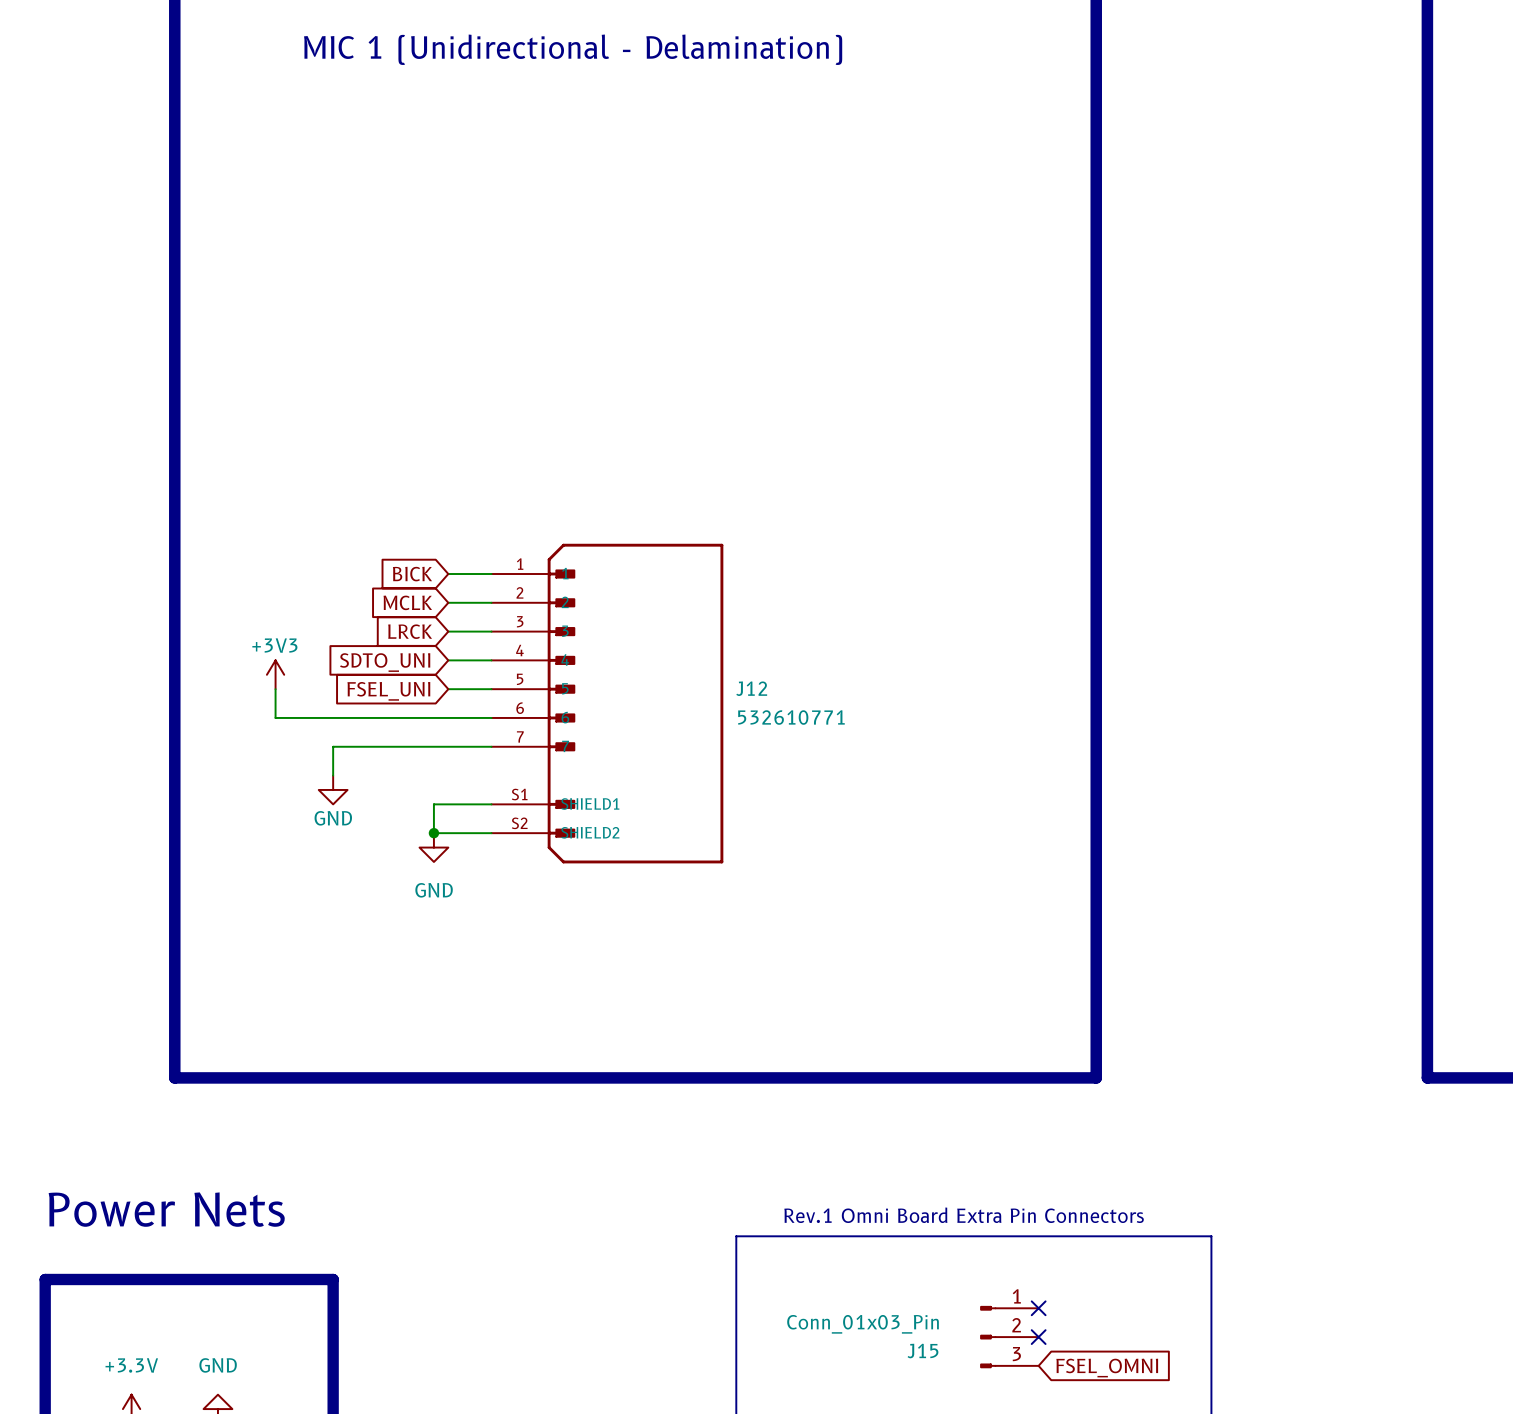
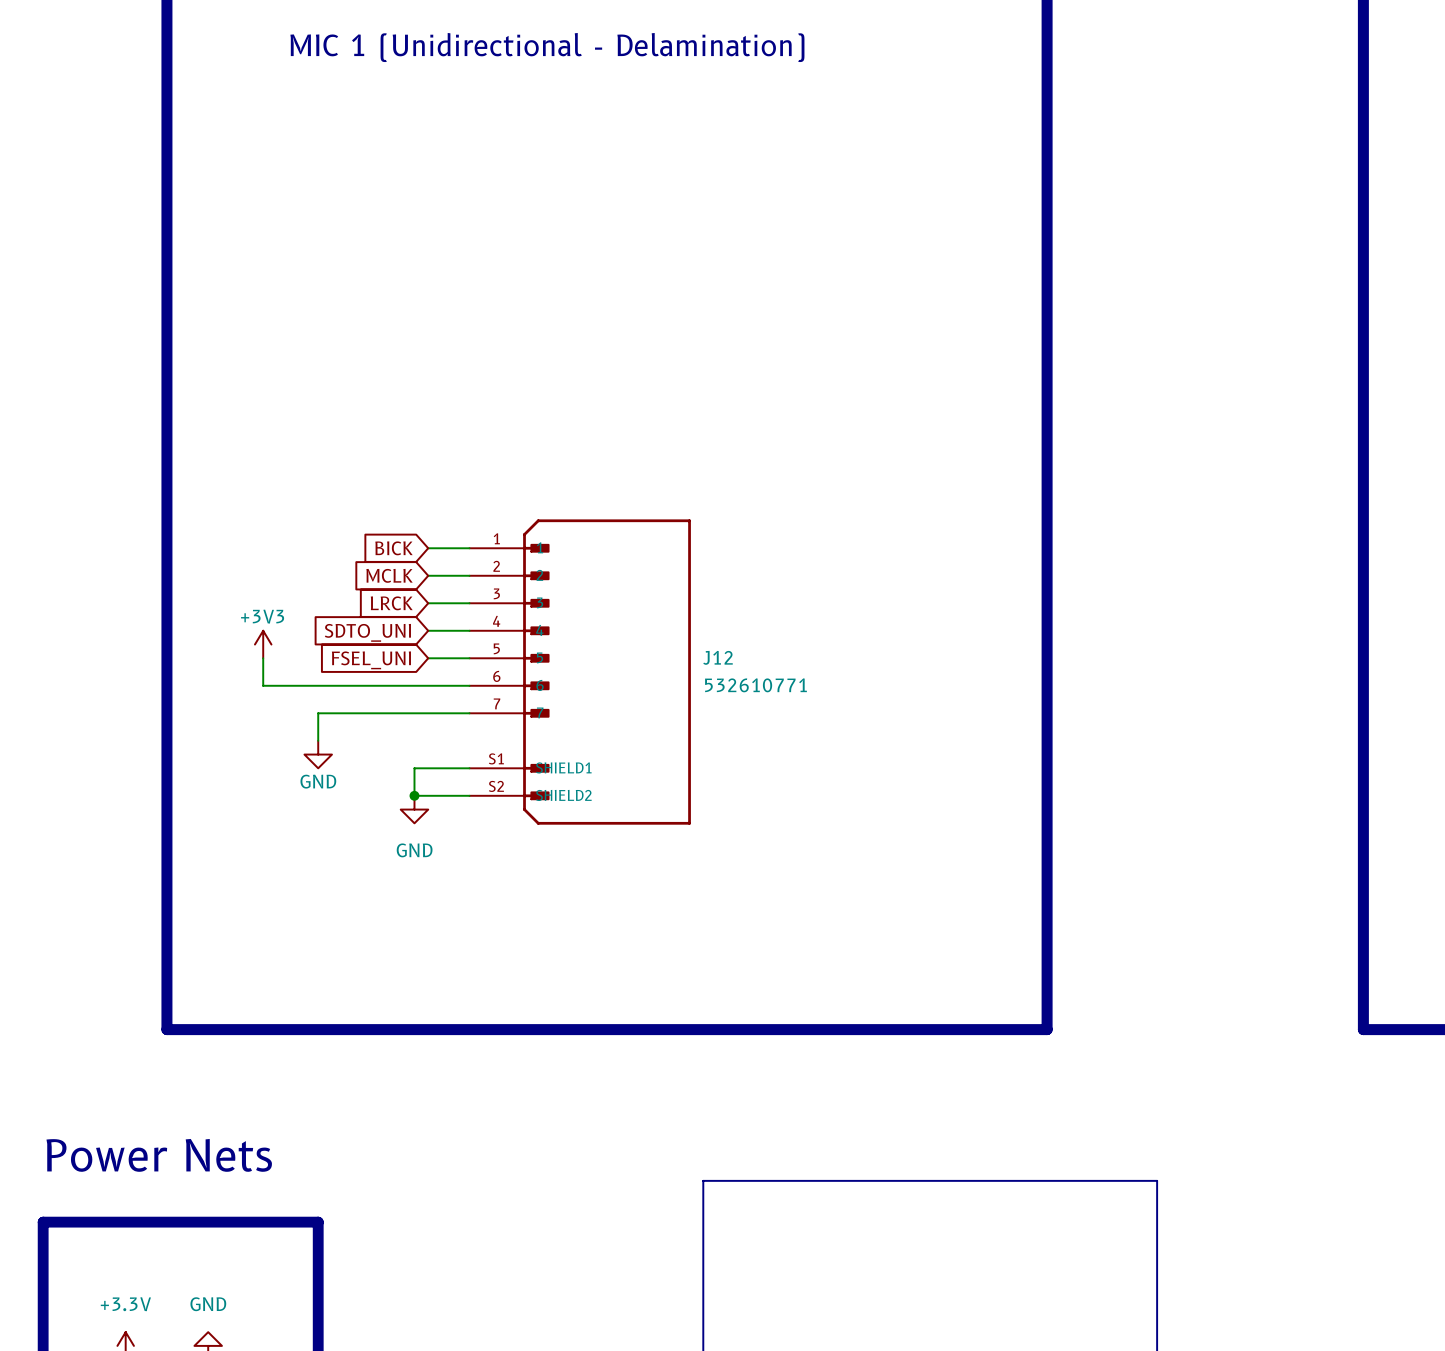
text: Rev.1 Omni Board Extra Pin Connectors (964, 1215) -> none
no-connect mark: (1038, 1308) -> none
J15: Conn_01x03_Pin (1009, 1337) -> none
no-connect mark: (1038, 1337) -> none
global label: FSEL_OMNI (1107, 1368) -> none

